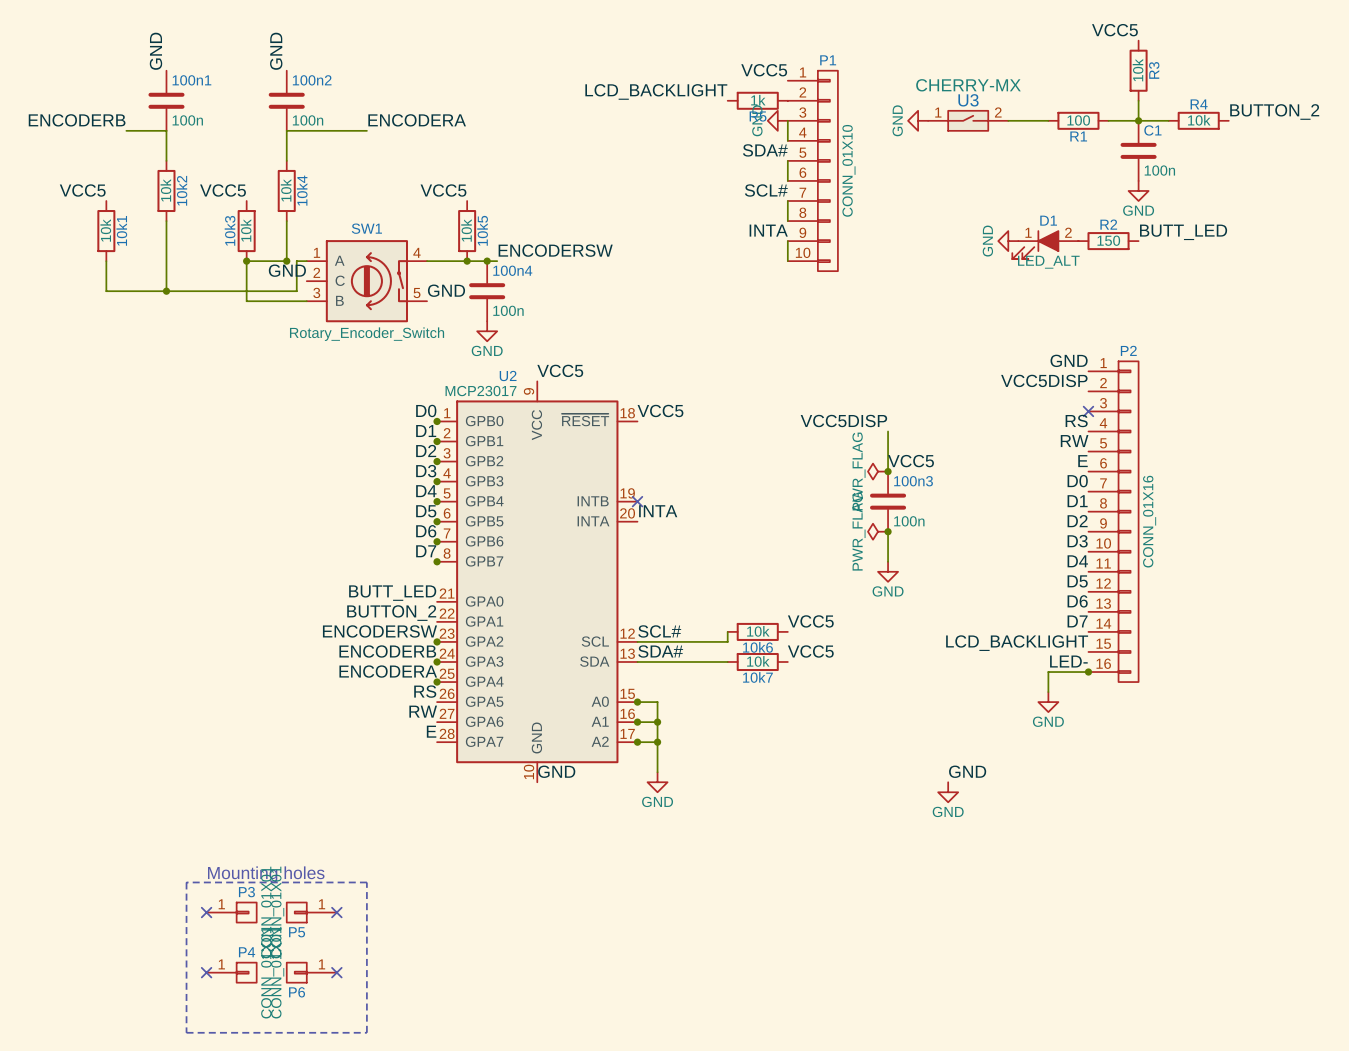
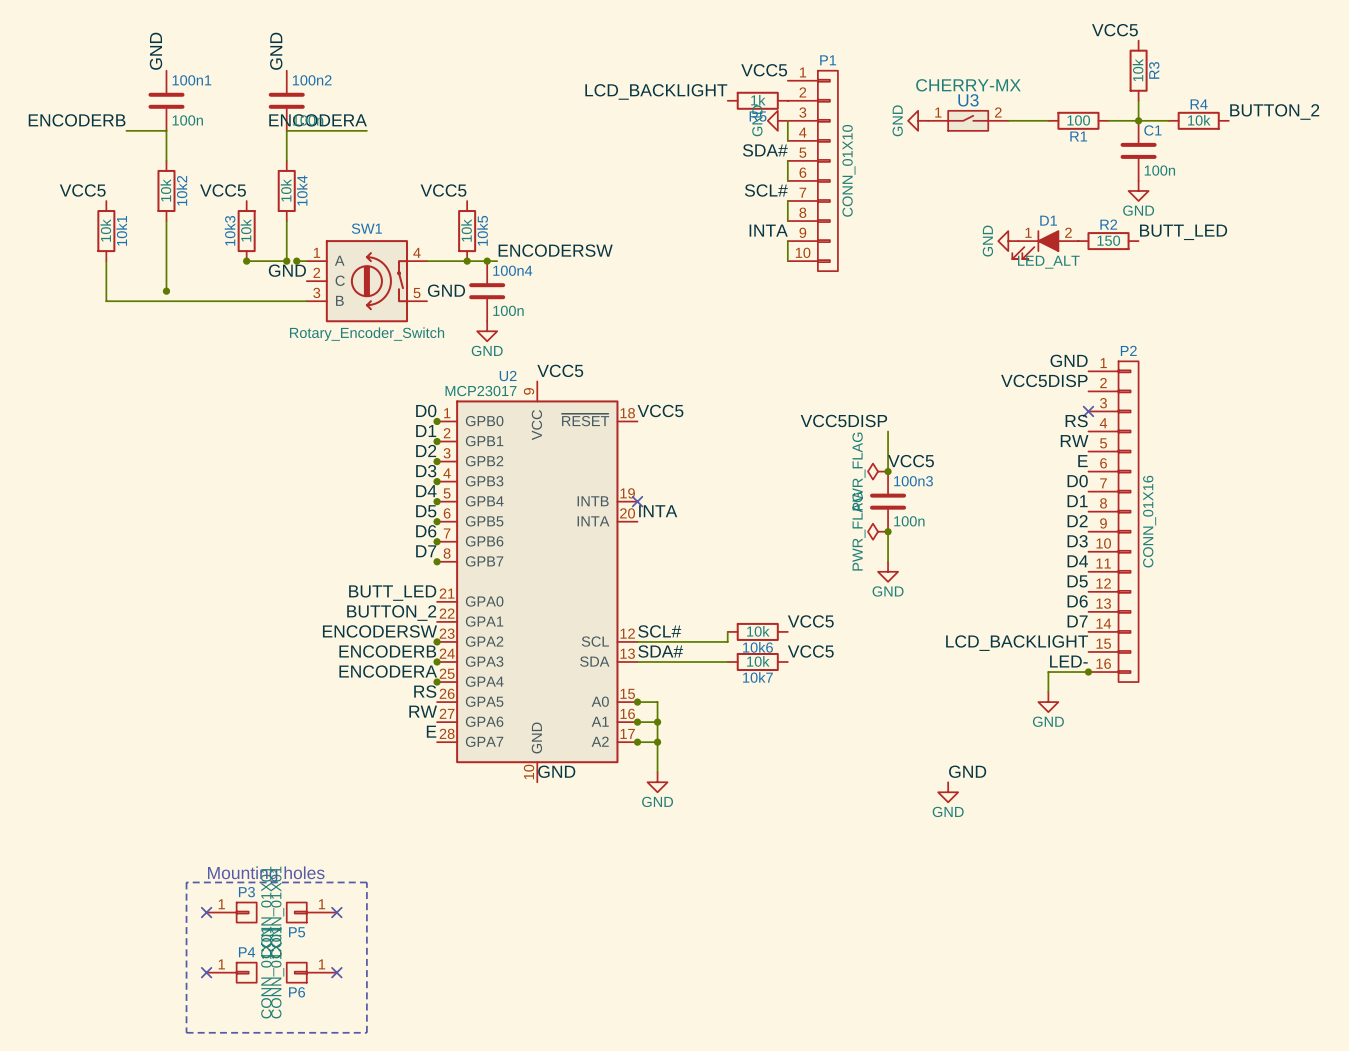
label position: ENCODERA (417, 120) -> ENCODERA (318, 120)
wire: (246, 261) (246, 301) -> none
wire: (296, 261) (296, 291) (106, 291) -> (246, 301) (106, 301) (106, 291)
junction: none -> (296, 261)

